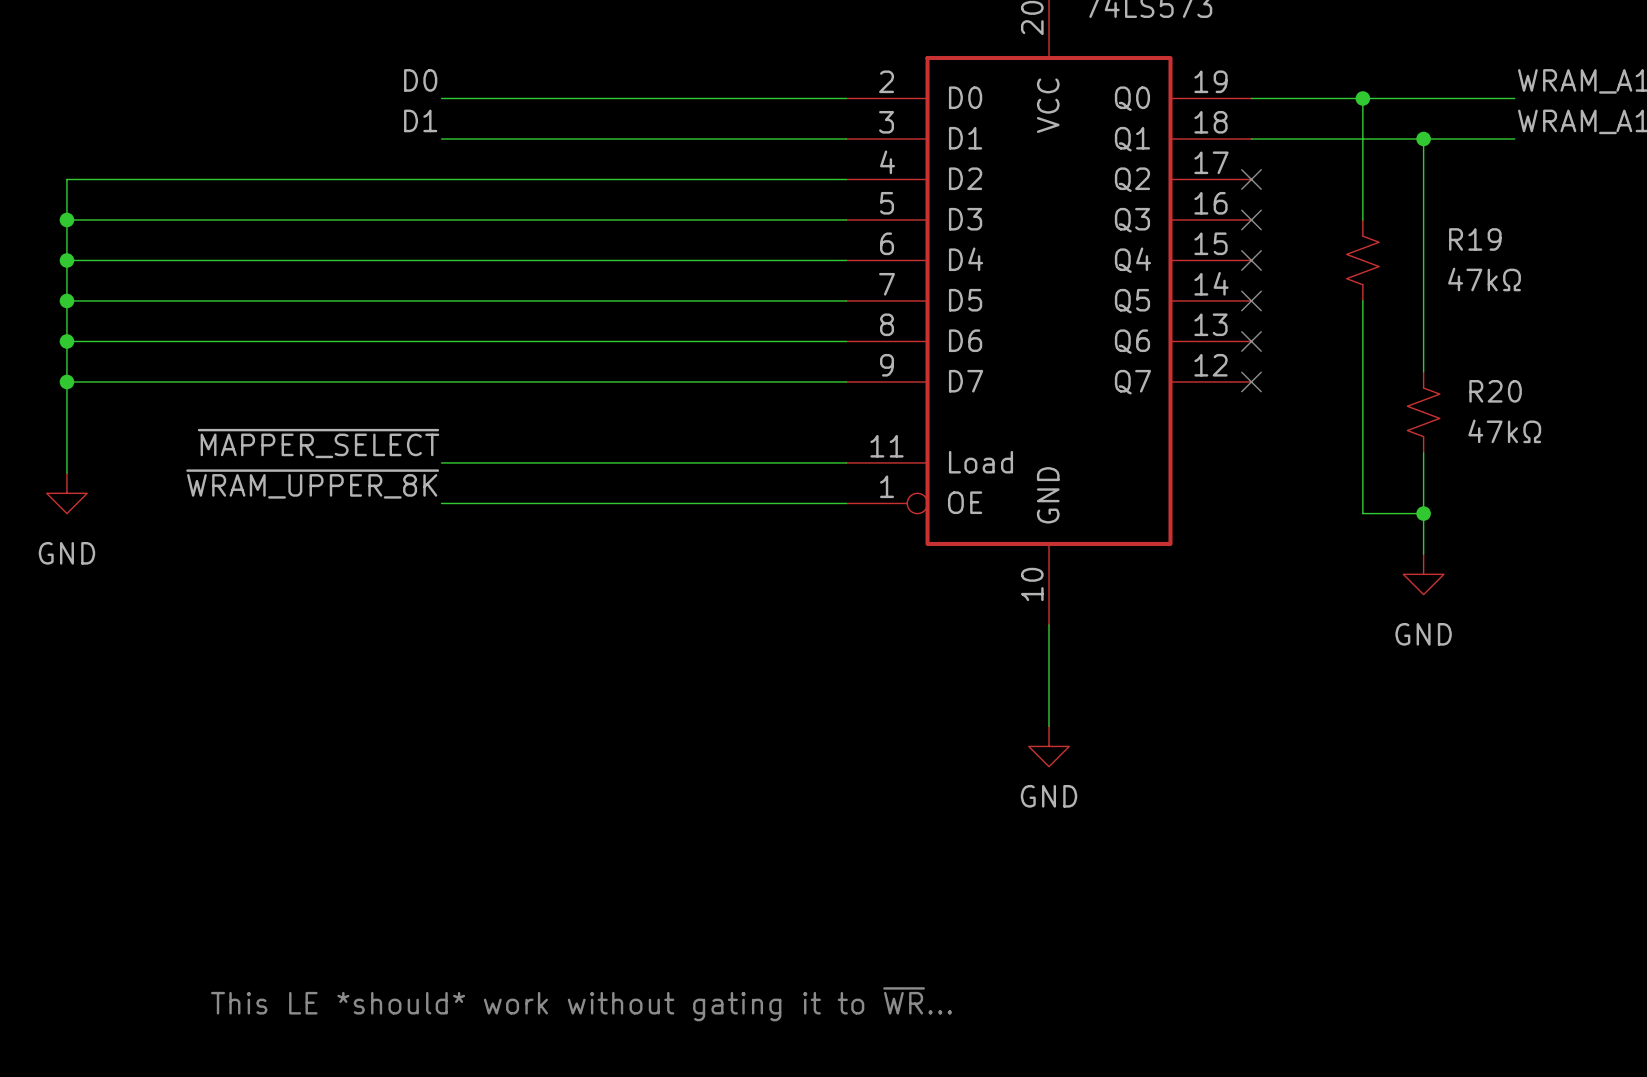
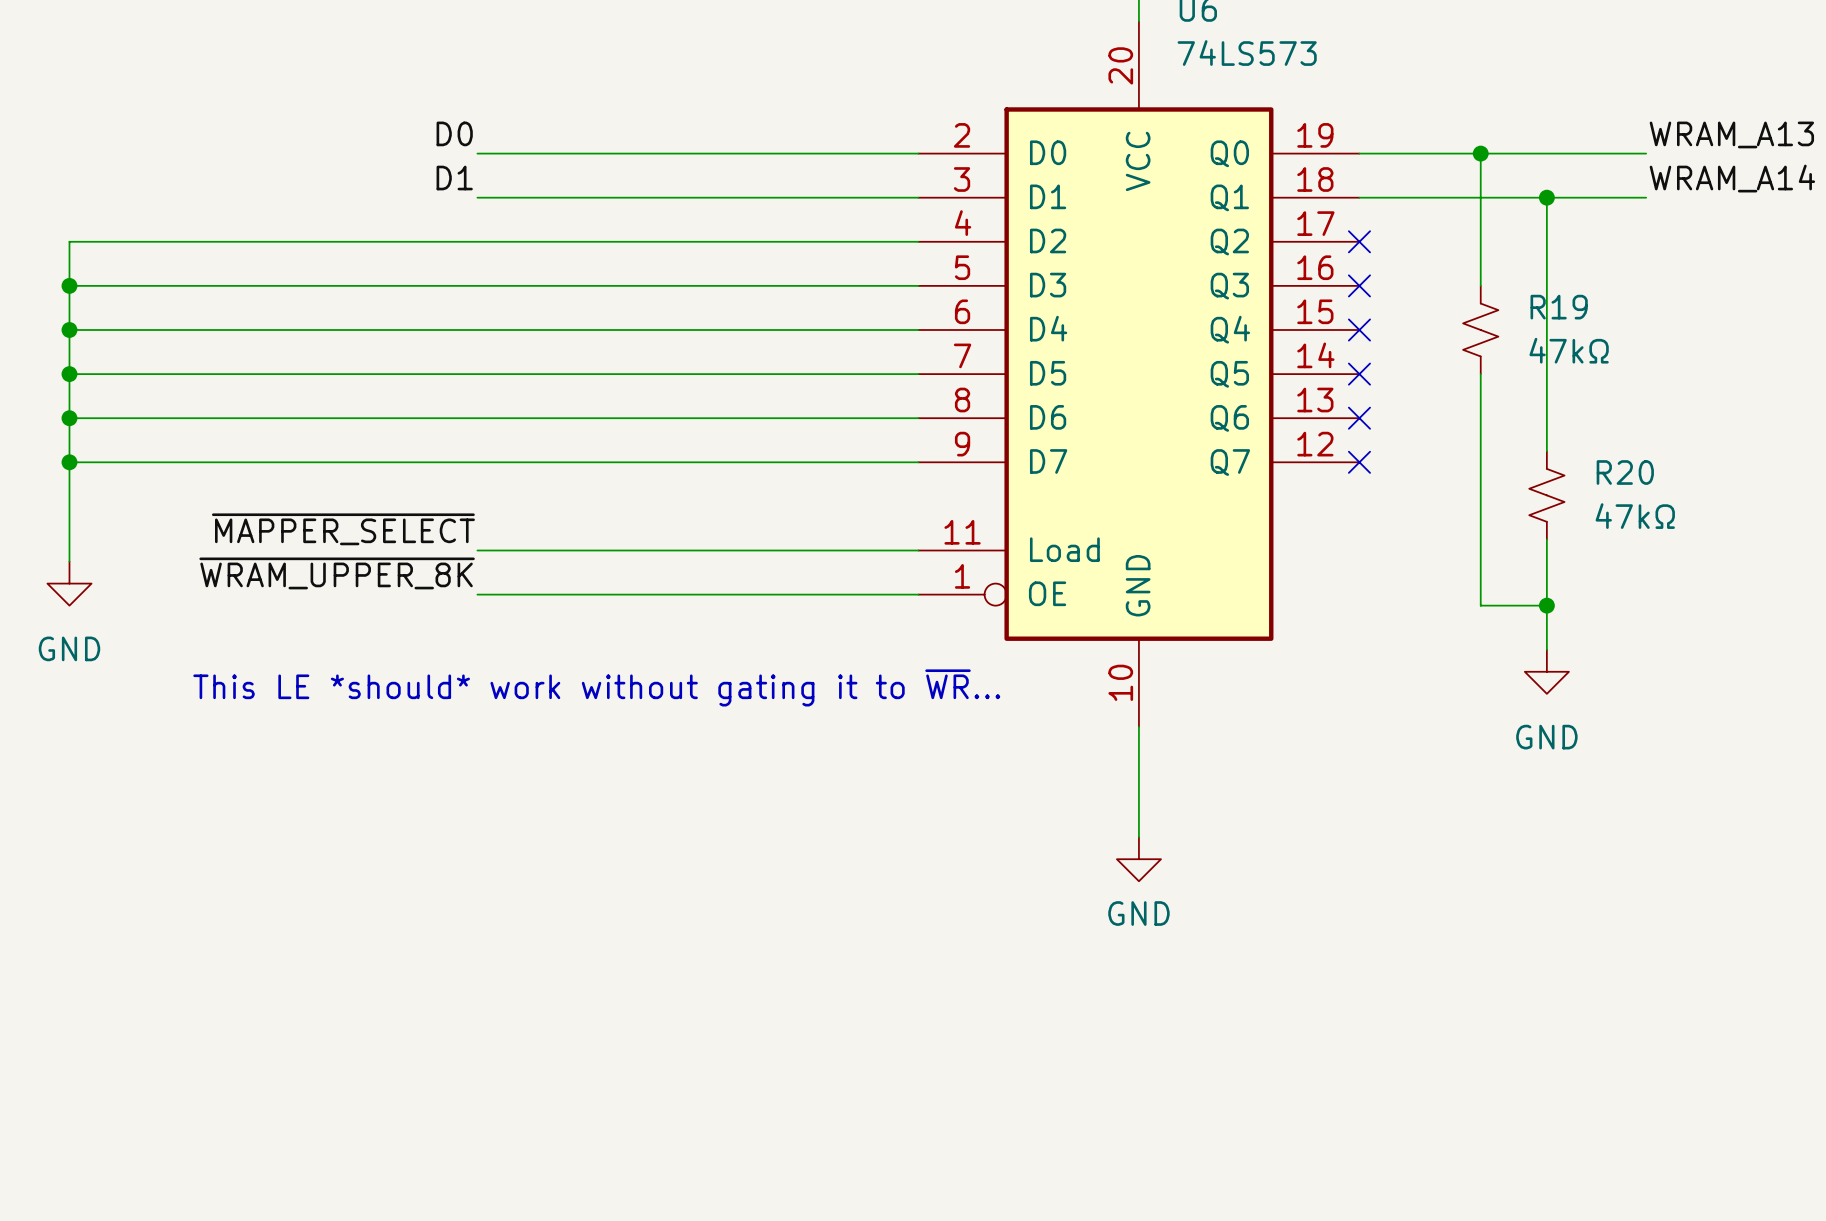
R19 name position: R19 (1475, 239) -> R19 (1559, 307)
R19 value position: 47kΩ (1484, 279) -> 47kΩ (1569, 350)
text: none -> This LE *should* work without gating it to ~{WR}... (596, 687)
text: This LE *should* work without gating it to ~{WR}... (581, 1004) -> none

